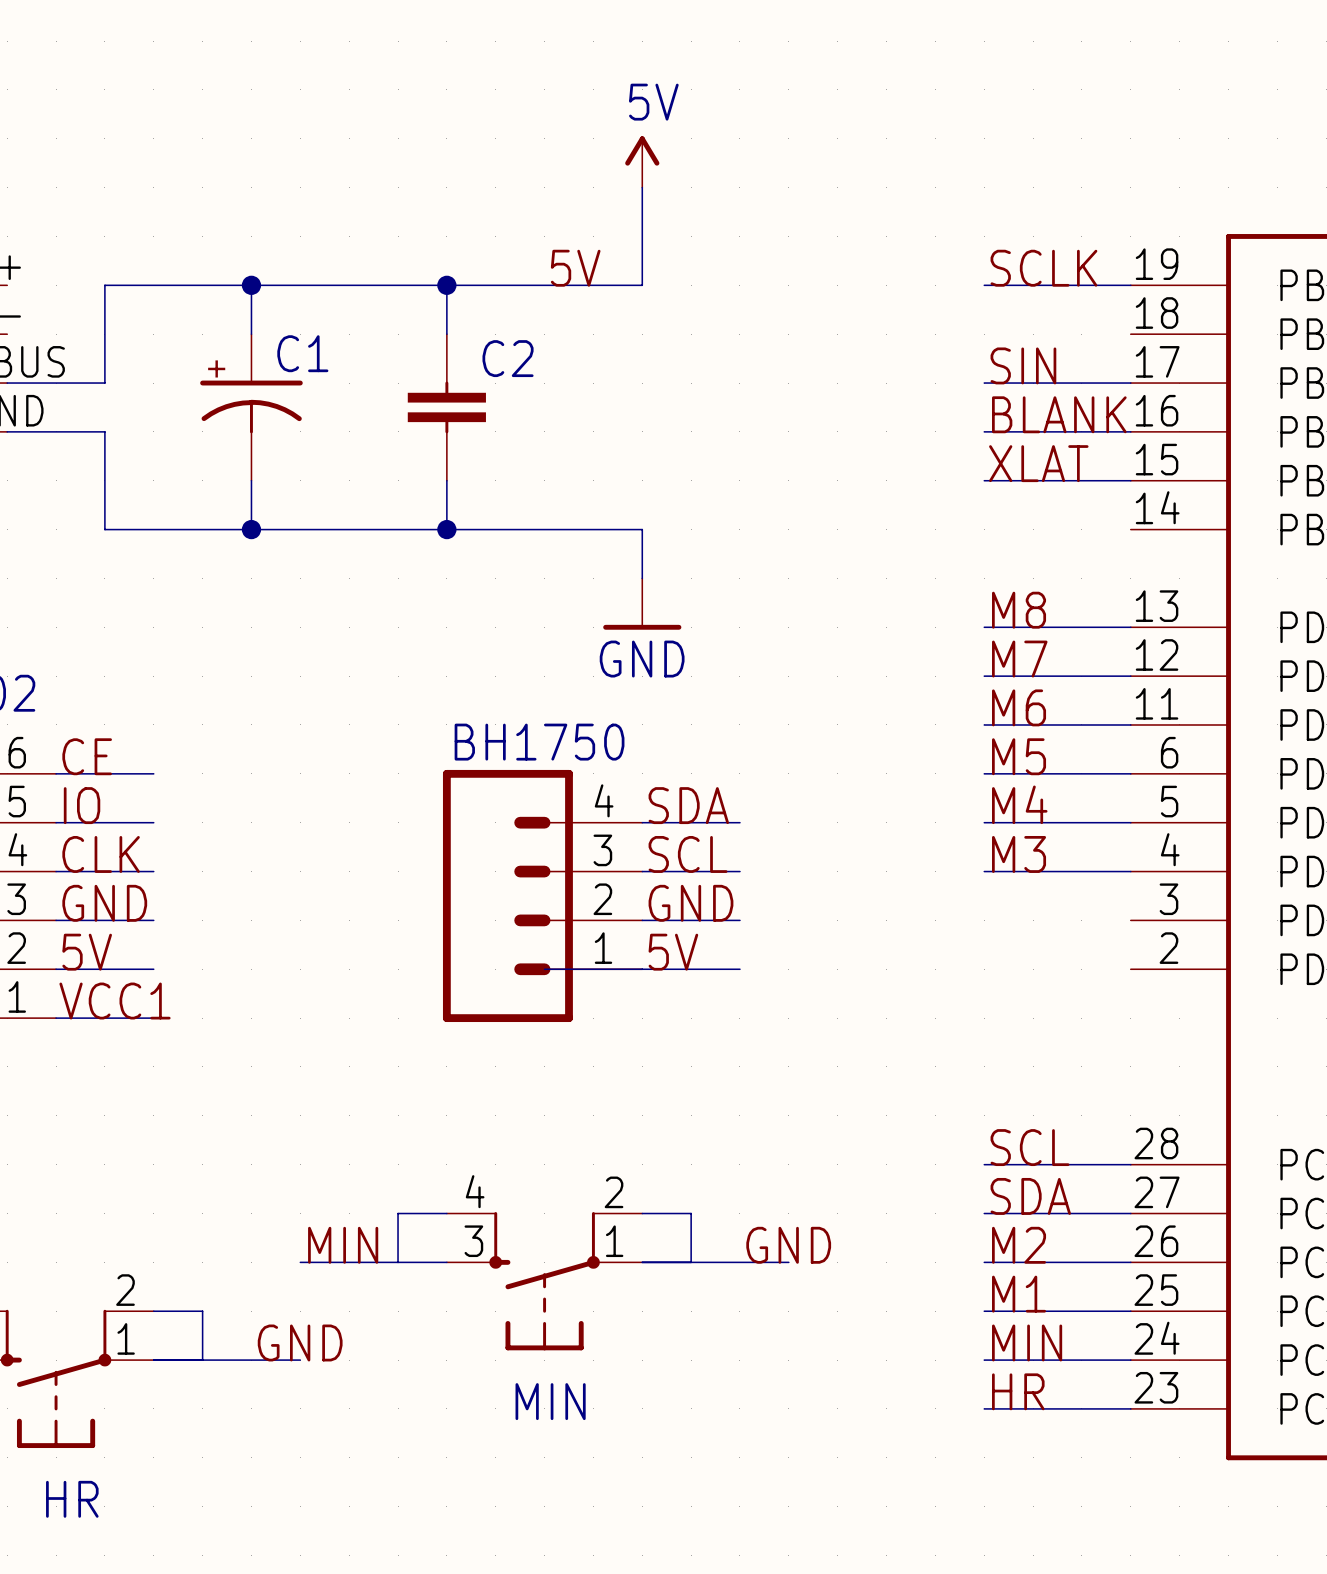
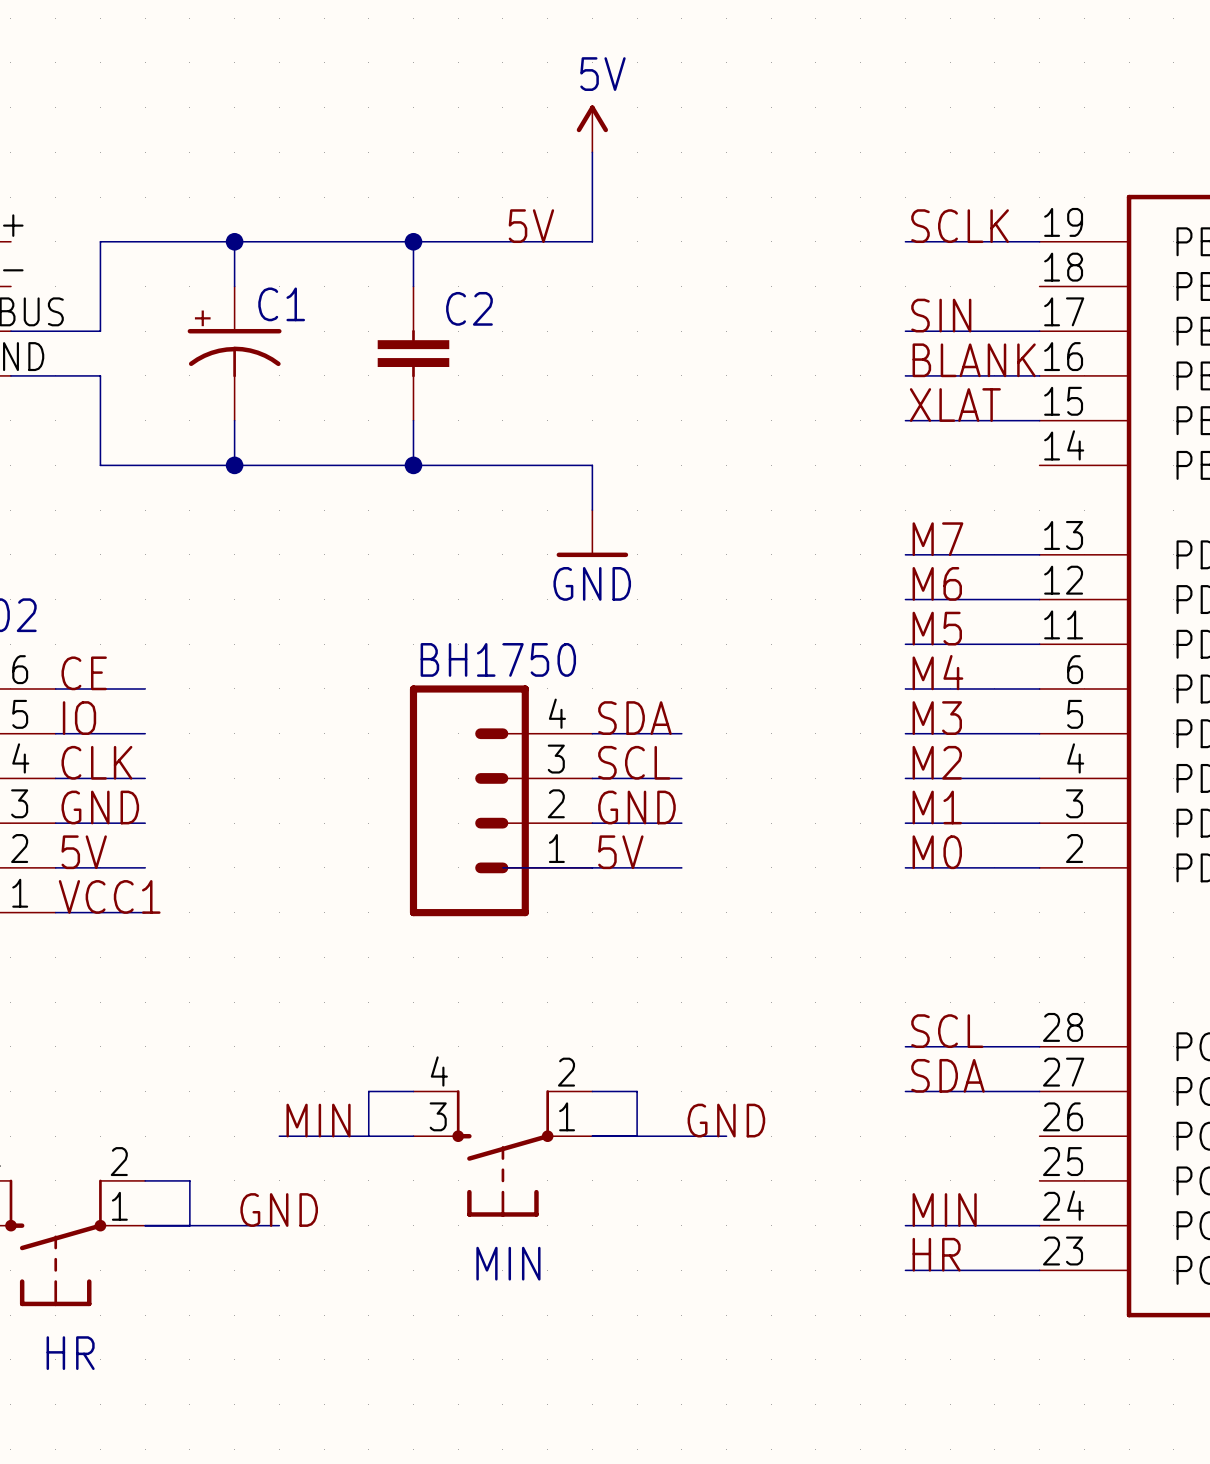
label: M8 (1019, 610) -> M7 (937, 539)
label: M7 (1019, 659) -> M6 (937, 583)
label: M6 (1019, 707) -> M5 (937, 628)
label: M5 (1019, 756) -> M4 (937, 672)
label: M4 (1019, 804) -> M3 (937, 718)
label: M3 (1019, 854) -> M2 (937, 762)
label: none -> M0 (937, 852)
label: M2 (1019, 1245) -> none
wire: (984, 1262) (1130, 1262) -> (905, 867) (1039, 867)
label position: M1 (1019, 1294) -> M1 (937, 807)
wire: (984, 1311) (1130, 1311) -> (905, 823) (1039, 823)

